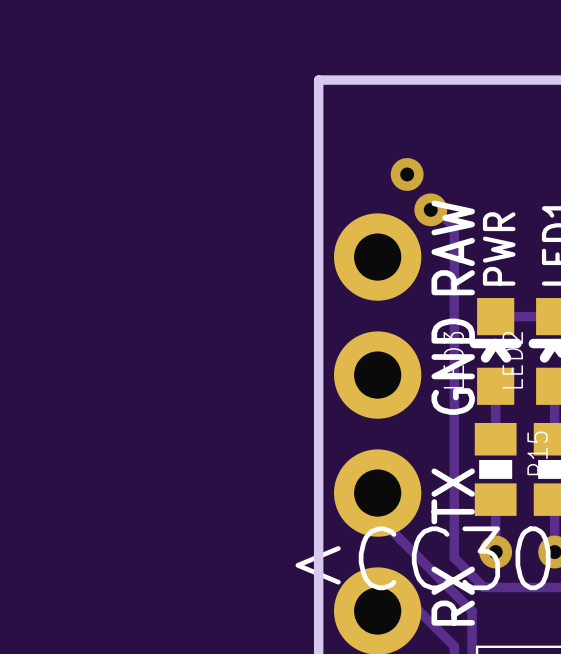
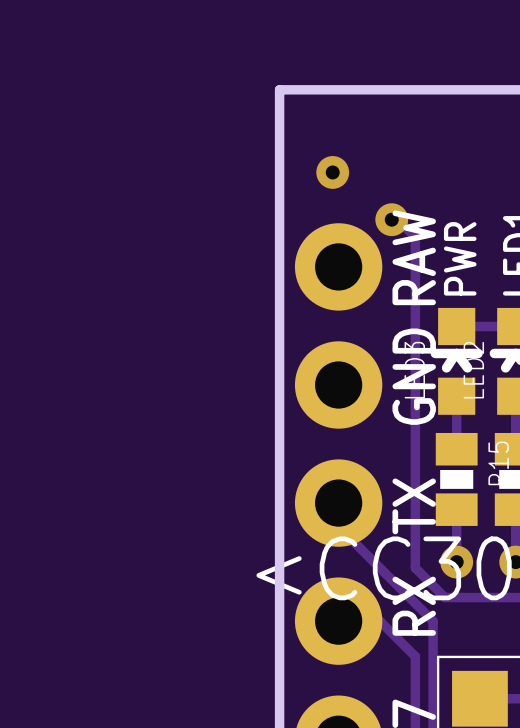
via position: (407, 174) -> (332, 172)

